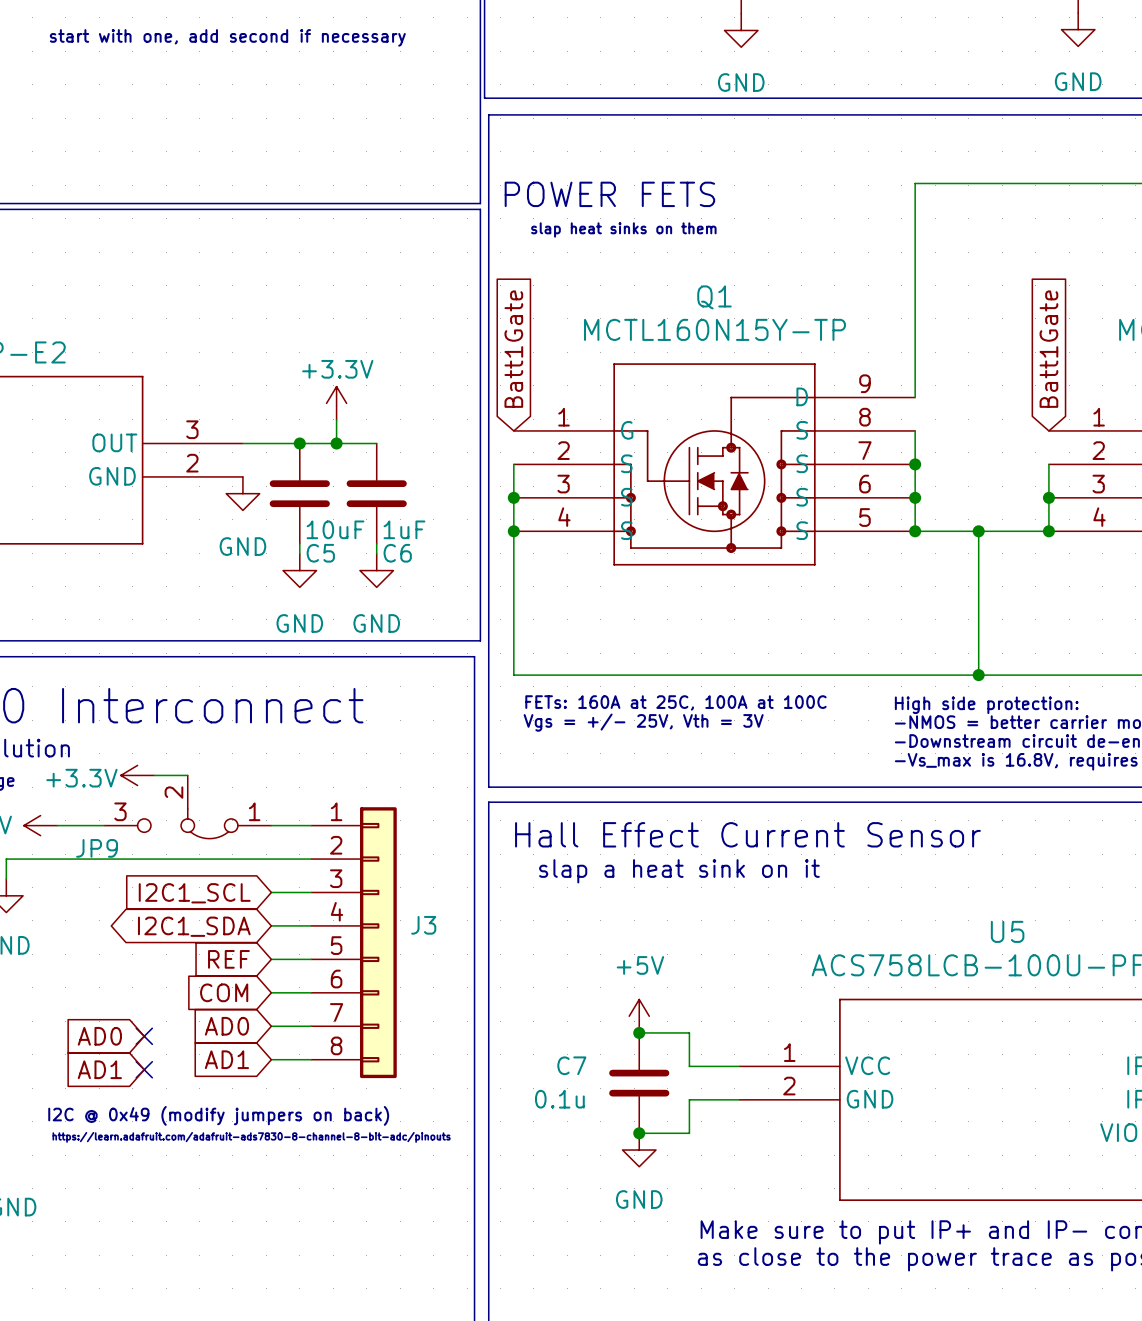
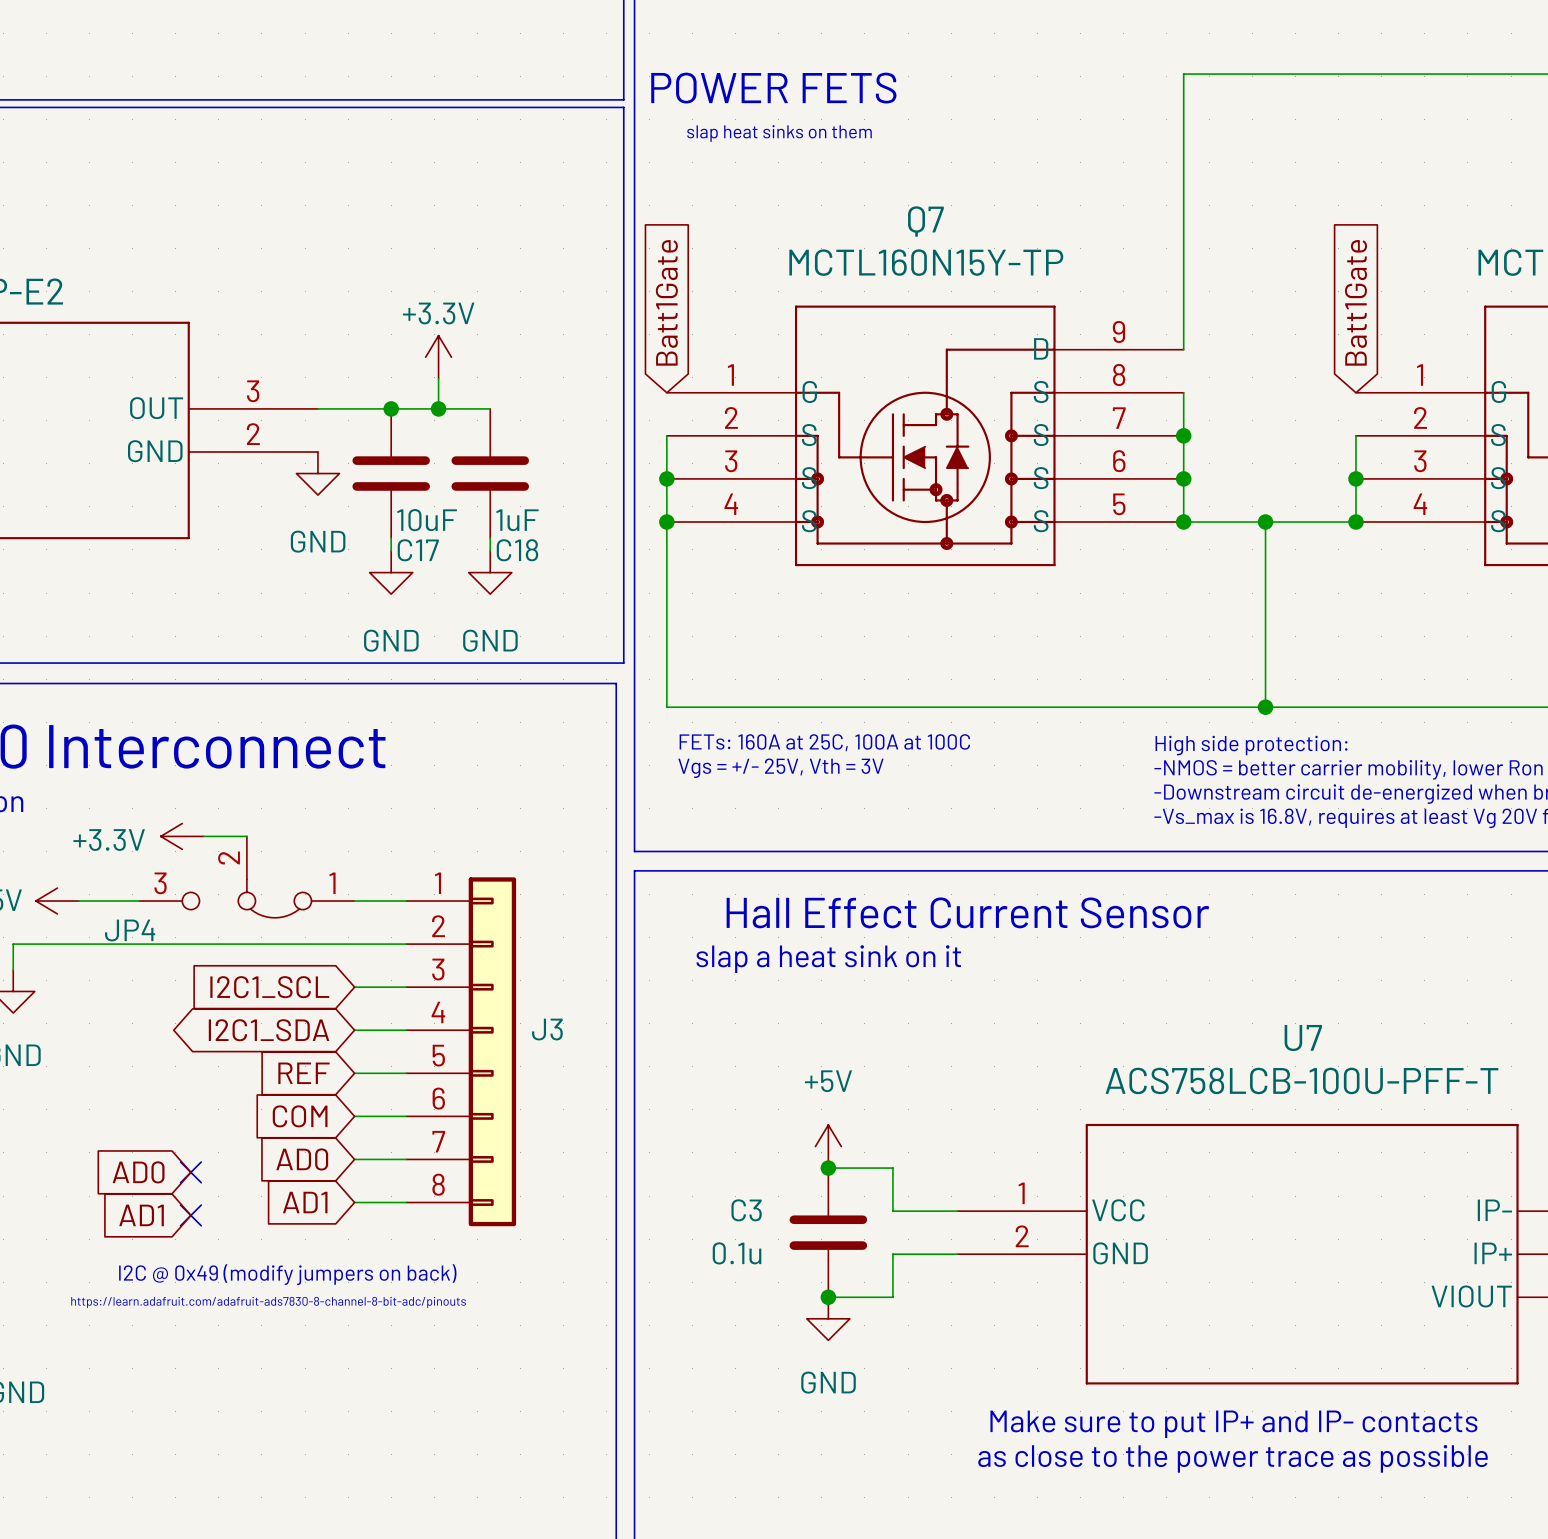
Q1 name: Q1 (714, 297) -> Q7 (925, 221)
C5 name: C5 (320, 553) -> C17 (418, 550)
C6 name: C6 (397, 553) -> C18 (517, 550)
JP9 name: JP9 (97, 848) -> JP4 (130, 930)
U5 name: U5 (1007, 931) -> U7 (1303, 1038)
C7 name: C7 (571, 1065) -> C3 (746, 1210)

